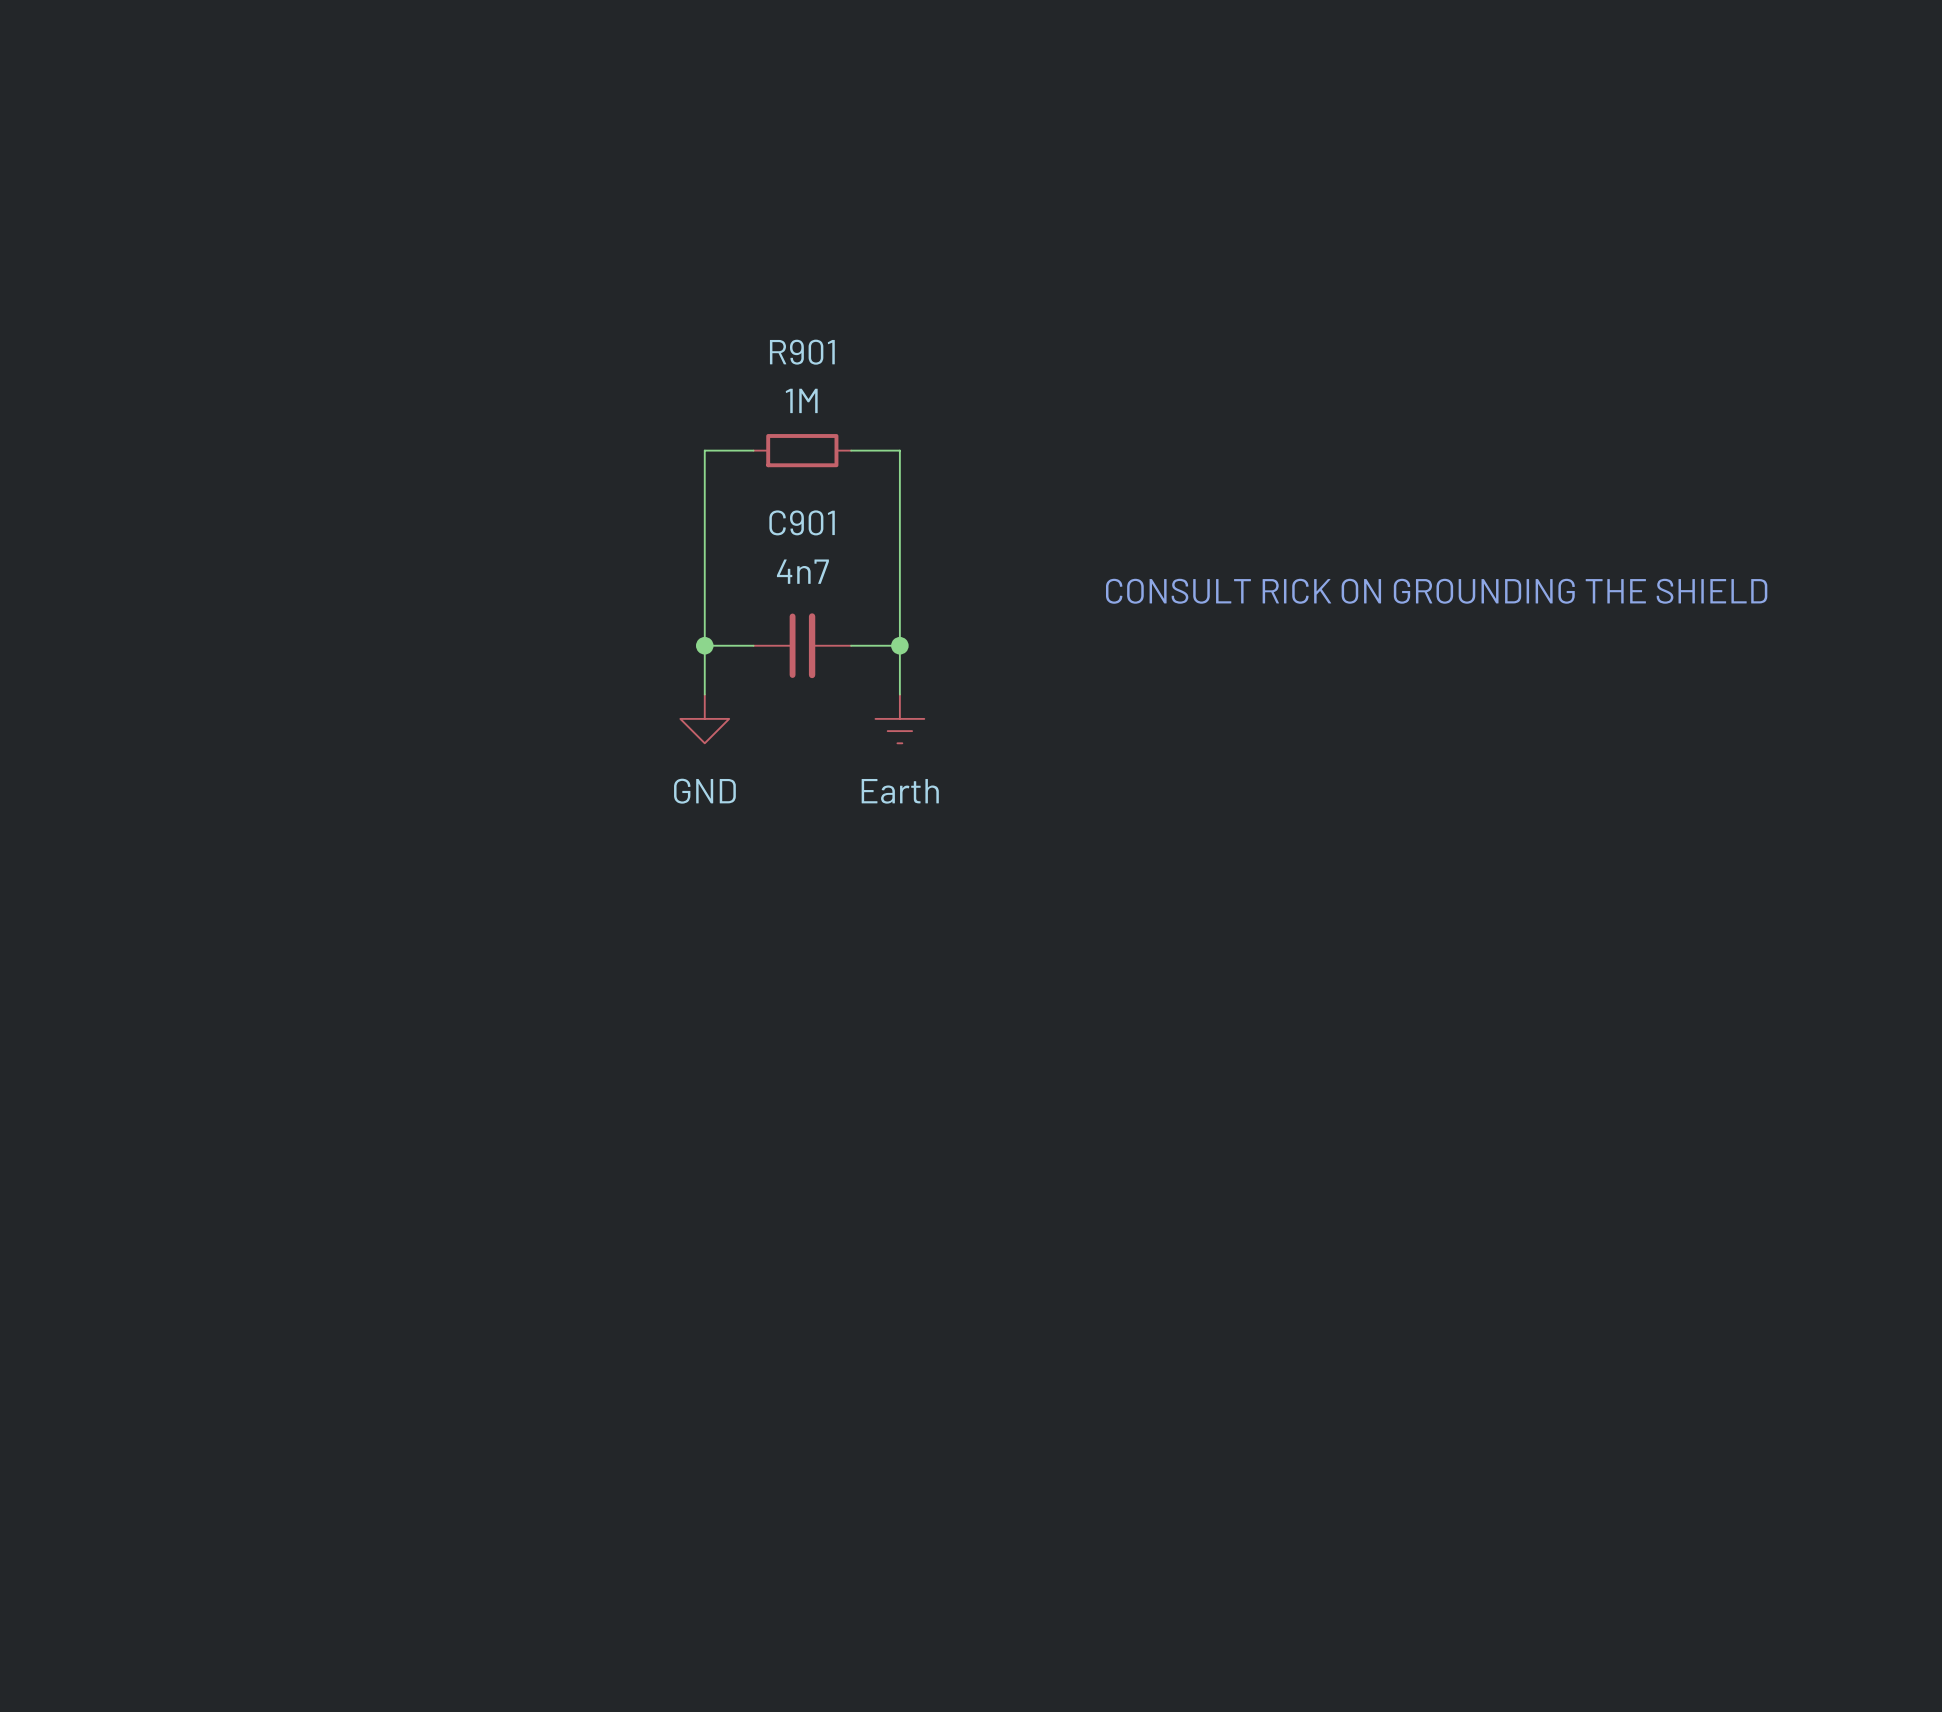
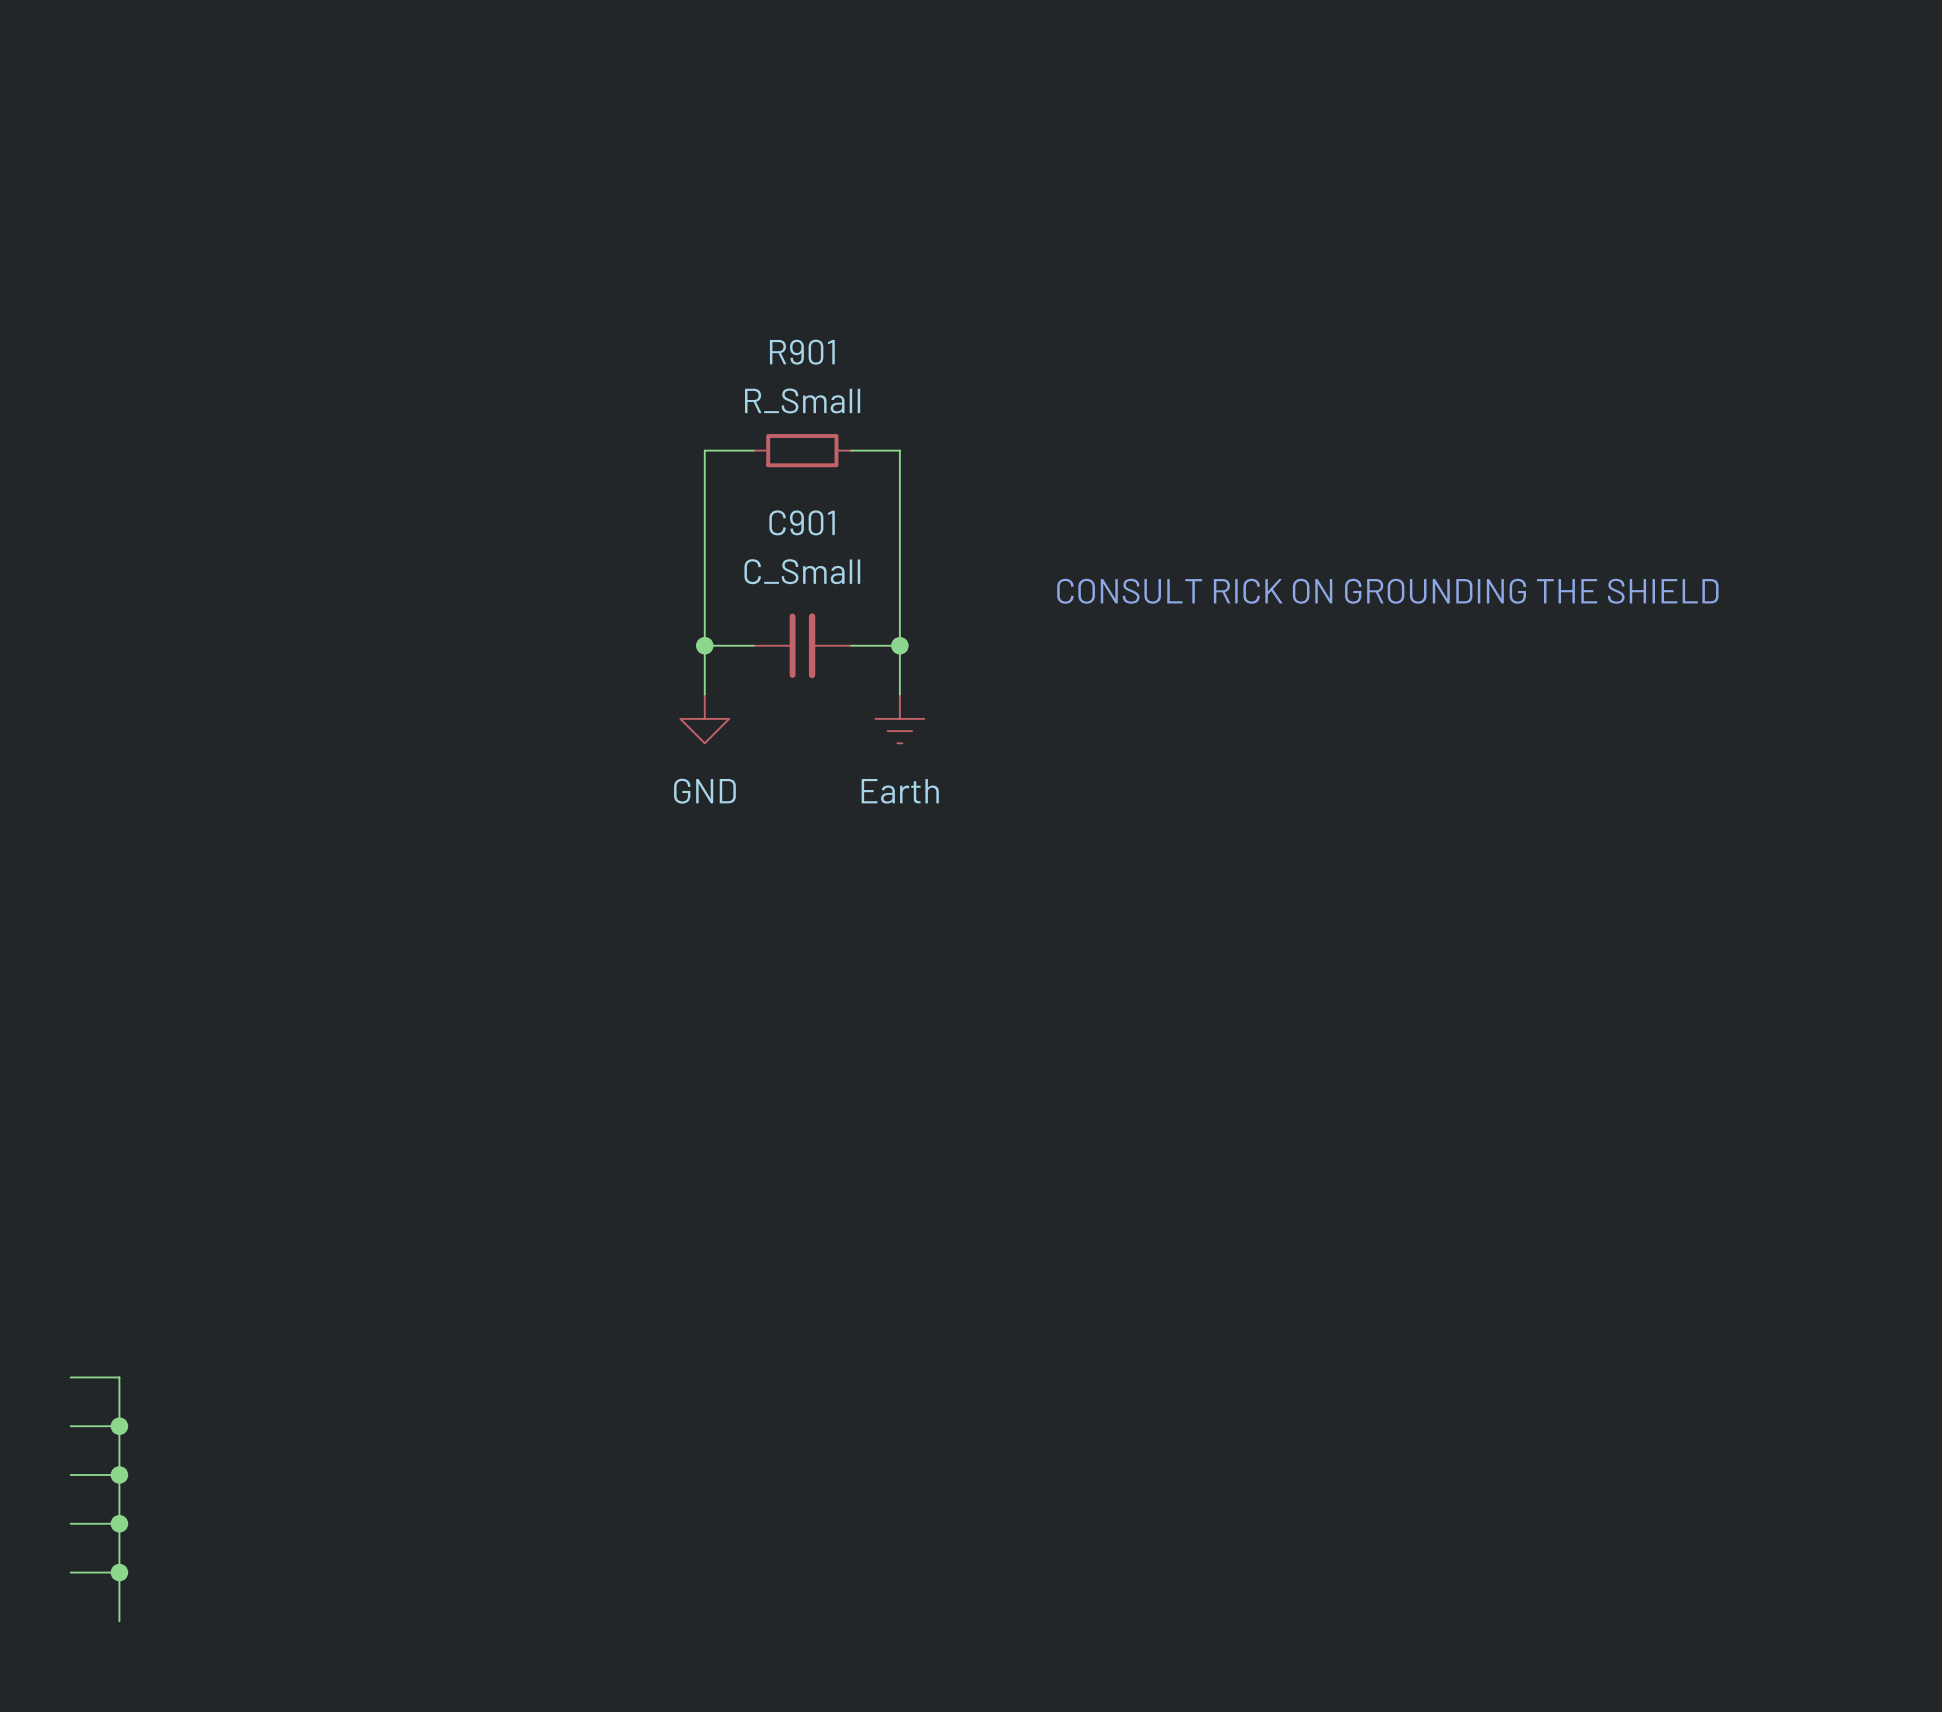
R901 value: 1M (801, 400) -> R_Small (802, 400)
C901 value: 4n7 (802, 571) -> C_Small (802, 571)
text position: CONSULT RICK ON GROUNDING THE SHIELD (1436, 591) -> CONSULT RICK ON GROUNDING THE SHIELD (1387, 591)
wire: none -> (70, 1377) (119, 1377) (119, 1621)
wire: none -> (70, 1426) (119, 1426)
junction: none -> (119, 1426)
wire: none -> (70, 1475) (119, 1475)
junction: none -> (119, 1475)
wire: none -> (70, 1523) (119, 1523)
junction: none -> (119, 1523)
wire: none -> (70, 1572) (119, 1572)
junction: none -> (119, 1572)

